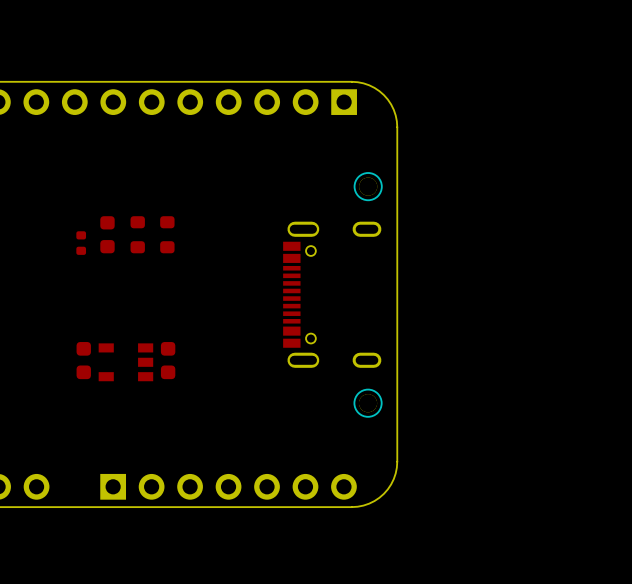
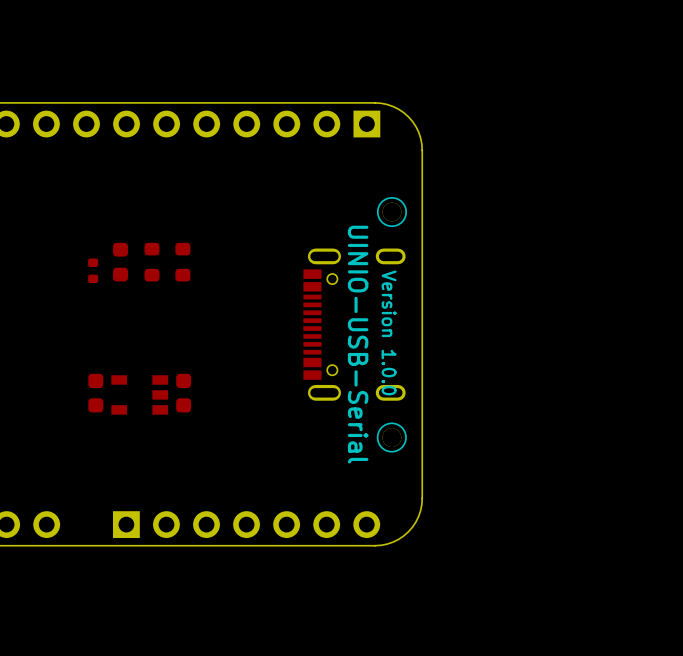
text: none -> Version 1.0.0 (389, 332)
text: none -> UINIO-USB-Serial (358, 344)

